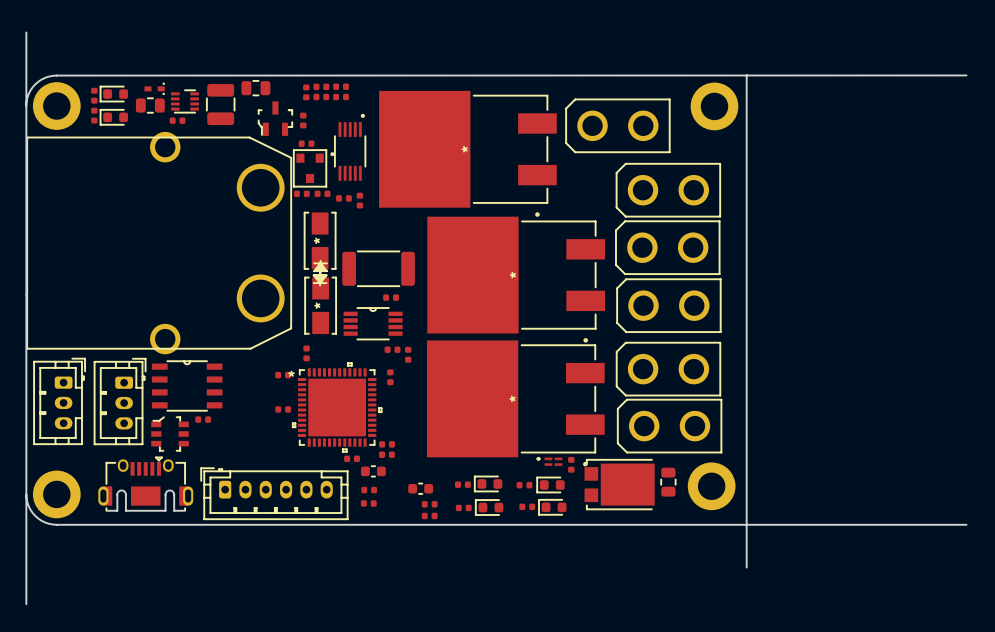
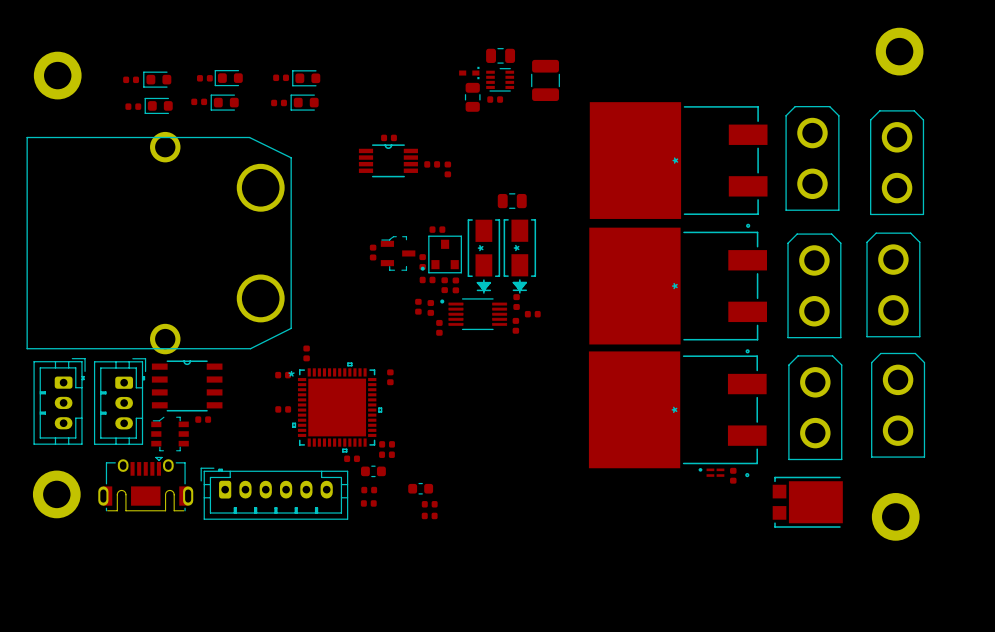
board edge: (26, 32) (26, 604) -> none
part: none -> (500, 55)
part: none -> (469, 73)
board edge: (746, 75) (746, 567) -> none
board edge: (966, 75) (56, 75) (45, 77) (35, 84) (28, 94) (26, 106) -> none
part: none -> (281, 77)
part: none -> (204, 78)
part: none -> (228, 78)
part: none -> (306, 78)
part: none -> (131, 79)
part: none -> (157, 79)
part: none -> (500, 79)
part: none -> (545, 80)
part footprint: [206, 83, 236, 126] -> [210, 94, 239, 111]
part: (321, 86) -> none
part: (341, 86) -> none
part: (154, 88) -> none
part: (255, 88) -> none
part: (306, 92) -> none
part: (114, 94) -> none
part: (94, 95) -> none
part: (321, 96) -> none
part: (341, 96) -> none
part footprint: [135, 97, 165, 114] -> [144, 97, 173, 115]
part: none -> (472, 97)
part: none -> (495, 99)
part: (184, 101) -> none
part: none -> (199, 101)
part: none -> (279, 102)
part: none -> (304, 102)
part position: (56, 106) -> (57, 75)
part: none -> (133, 106)
part position: (714, 106) -> (899, 51)
part: (94, 115) -> none
part: (114, 117) -> none
part rotation: 0° (275, 118) -> 90° clockwise (398, 253)
part position: (275, 118) -> (398, 253)
part: (177, 120) -> none
part: (303, 120) -> none
part: (617, 125) -> none
part: none -> (389, 137)
part: (306, 143) -> none
part rotation: 0° (350, 147) -> 90° counterclockwise (473, 314)
part position: (350, 147) -> (473, 314)
part: (467, 153) -> none
part: none -> (812, 158)
part: none -> (897, 162)
part: none -> (432, 164)
part: none -> (678, 165)
part rotation: 0° (313, 168) -> 180° (441, 254)
part position: (313, 168) -> (441, 254)
part: none -> (447, 169)
part: (668, 190) -> none
part: (301, 193) -> none
part: (322, 193) -> none
part: (343, 198) -> none
part: (359, 200) -> none
part: none -> (512, 201)
part: none -> (437, 229)
part: (667, 247) -> none
part: (320, 249) -> none
part: none -> (373, 252)
part: none -> (483, 256)
part: none -> (519, 256)
part: none -> (422, 262)
part: (378, 268) -> none
part: none -> (427, 279)
part: (516, 279) -> none
part: none -> (893, 284)
part: none -> (444, 285)
part: none -> (455, 285)
part: none -> (814, 285)
part: none -> (678, 290)
part: (320, 297) -> none
part: (391, 297) -> none
part: none -> (516, 302)
part: (668, 305) -> none
part: none -> (418, 306)
part: none -> (430, 307)
part: none -> (532, 314)
part position: (373, 323) -> (388, 160)
part: none -> (515, 325)
part: none -> (439, 327)
part: (392, 349) -> none
part: (408, 354) -> none
part: (668, 369) -> none
part: (515, 403) -> none
part: none -> (898, 405)
part: none -> (815, 407)
part: none -> (677, 414)
part: (669, 426) -> none
part position: (549, 461) -> (711, 472)
part: (571, 464) -> none
part: none -> (733, 475)
part: (668, 482) -> none
part: (488, 483) -> none
part: (462, 484) -> none
part: (550, 484) -> none
part position: (619, 484) -> (807, 502)
part: (524, 485) -> none
part position: (711, 486) -> (895, 516)
board edge: (26, 494) (28, 506) (35, 515) (45, 522) (56, 524) (966, 524) -> none
part: (527, 506) -> none
part: (463, 507) -> none
part: (489, 507) -> none
part: (552, 507) -> none

